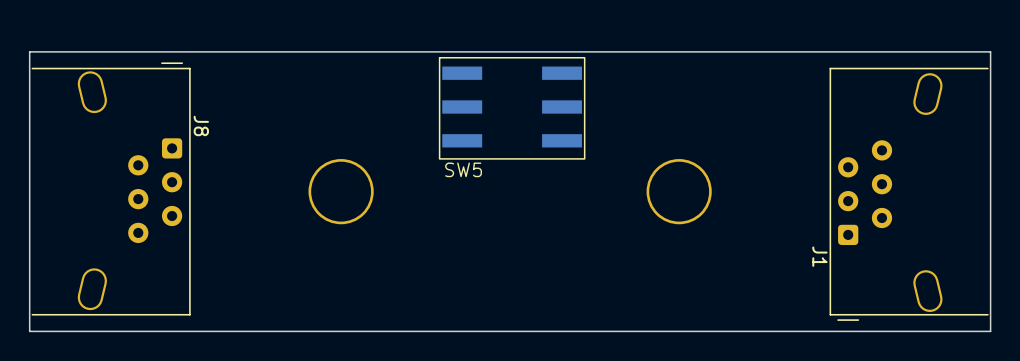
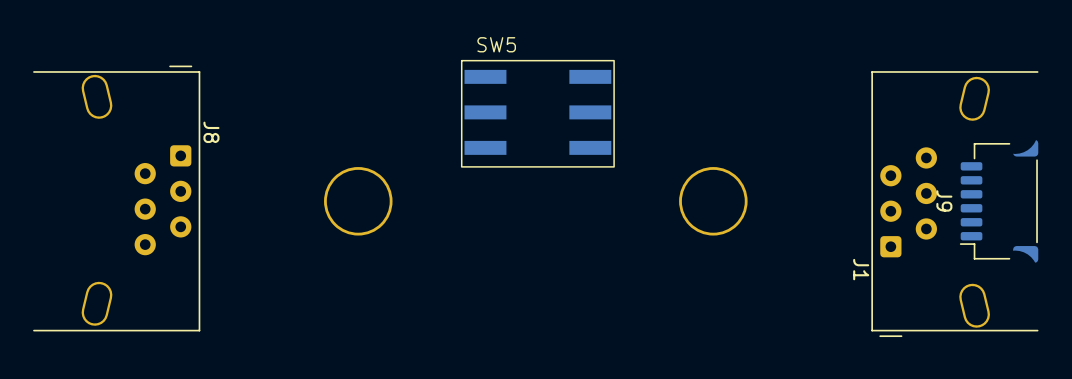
board edge: (990, 51) (29, 51) (29, 331) (990, 331) (990, 51) -> none
SW5 name position: SW5 (463, 169) -> SW5 (496, 44)
J9: none -> (999, 201)

